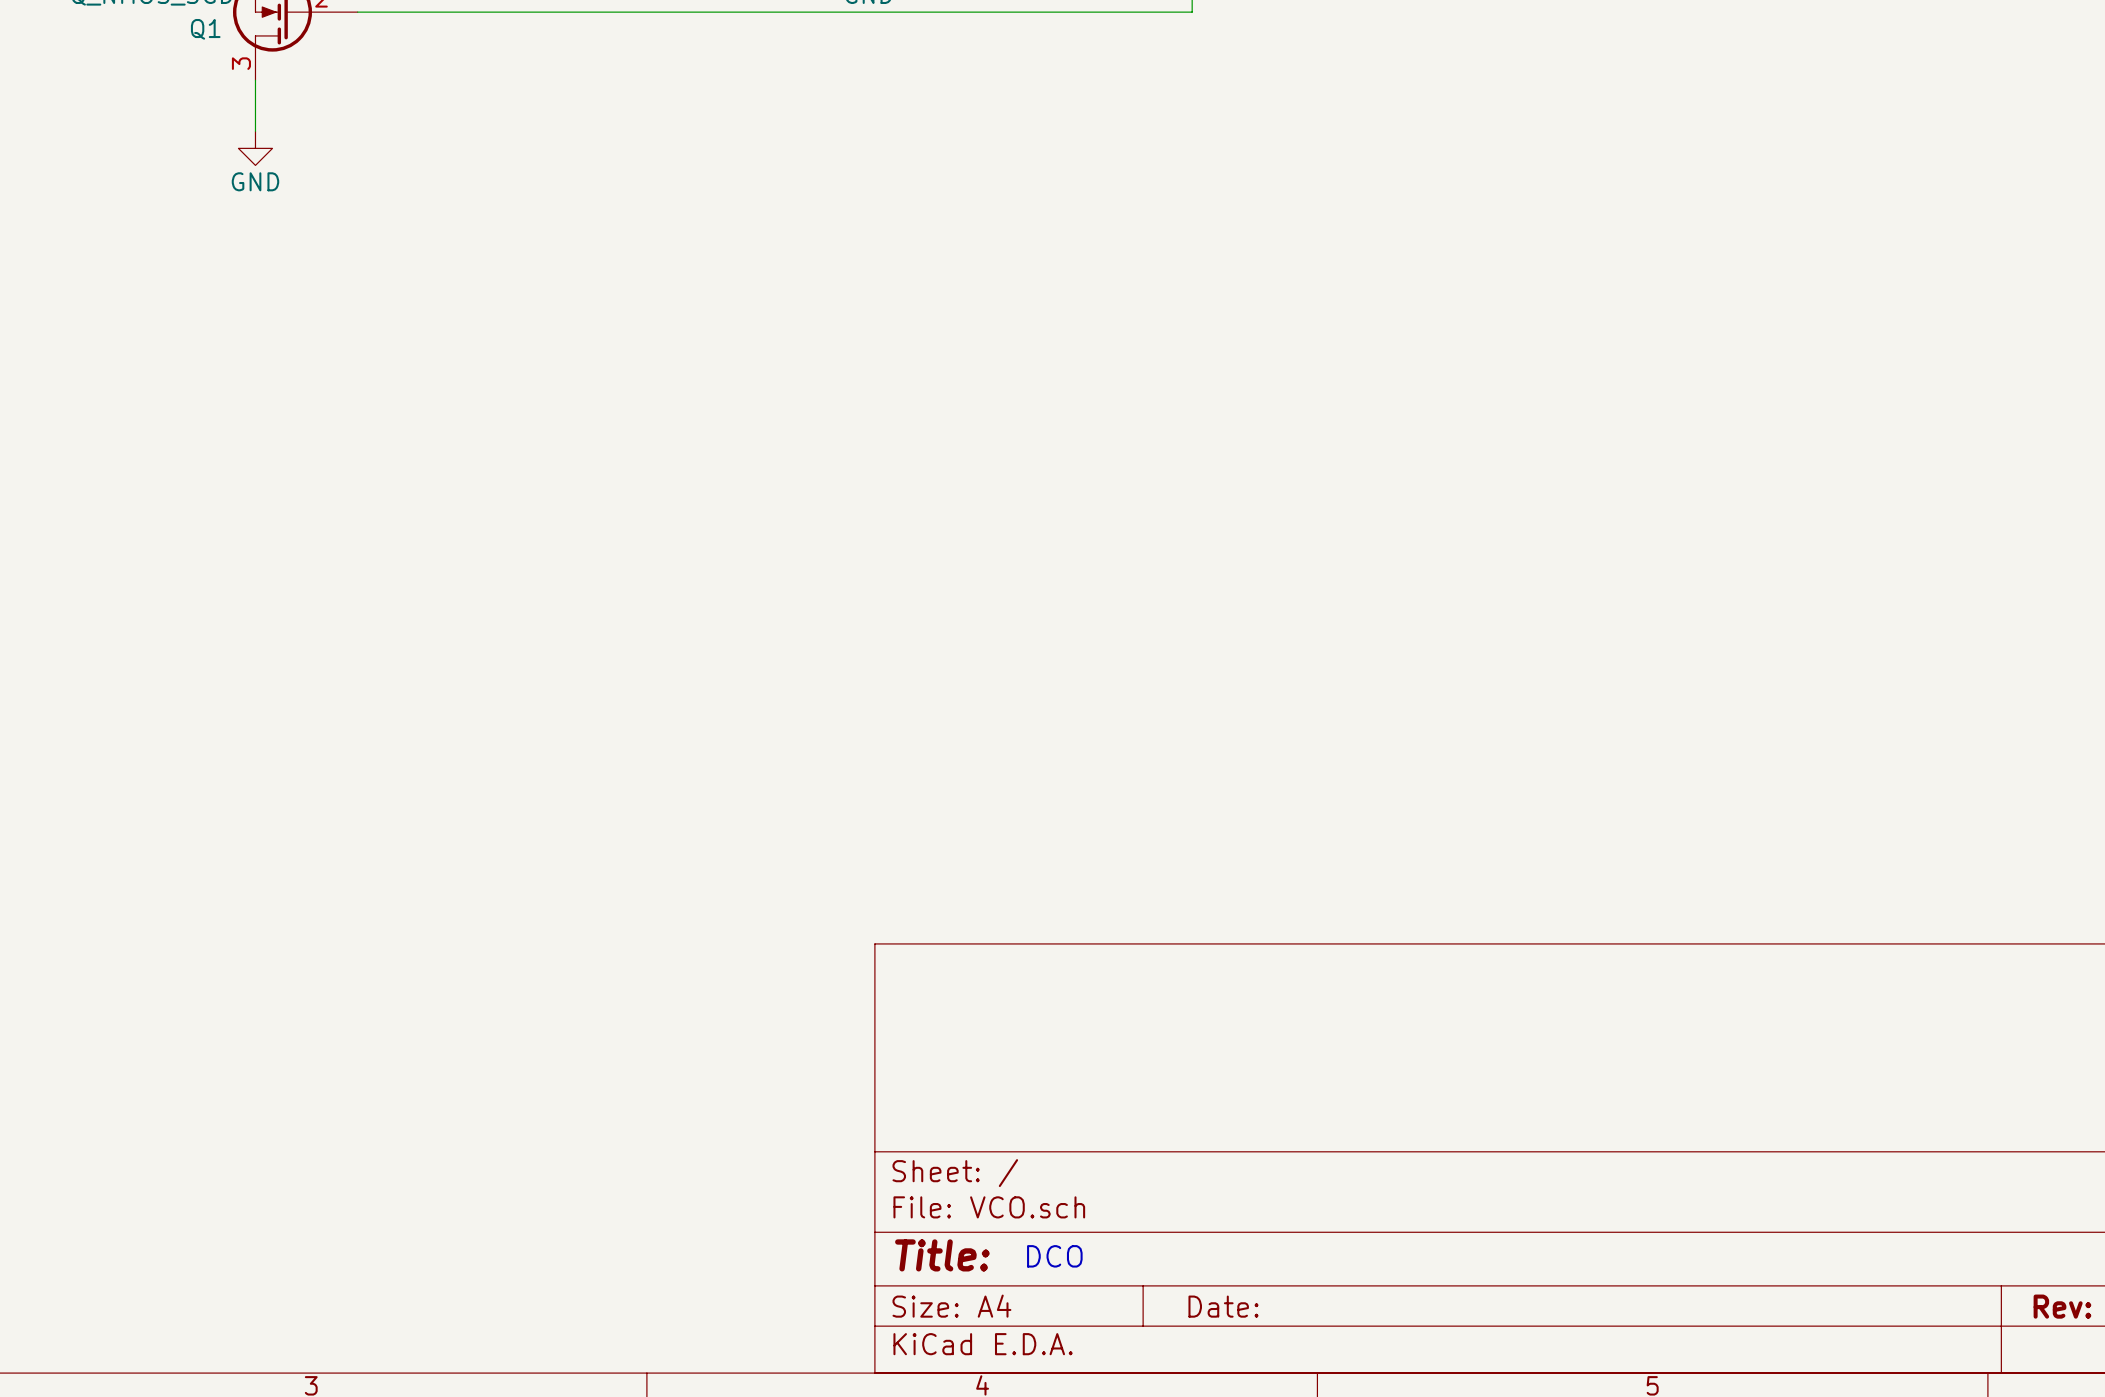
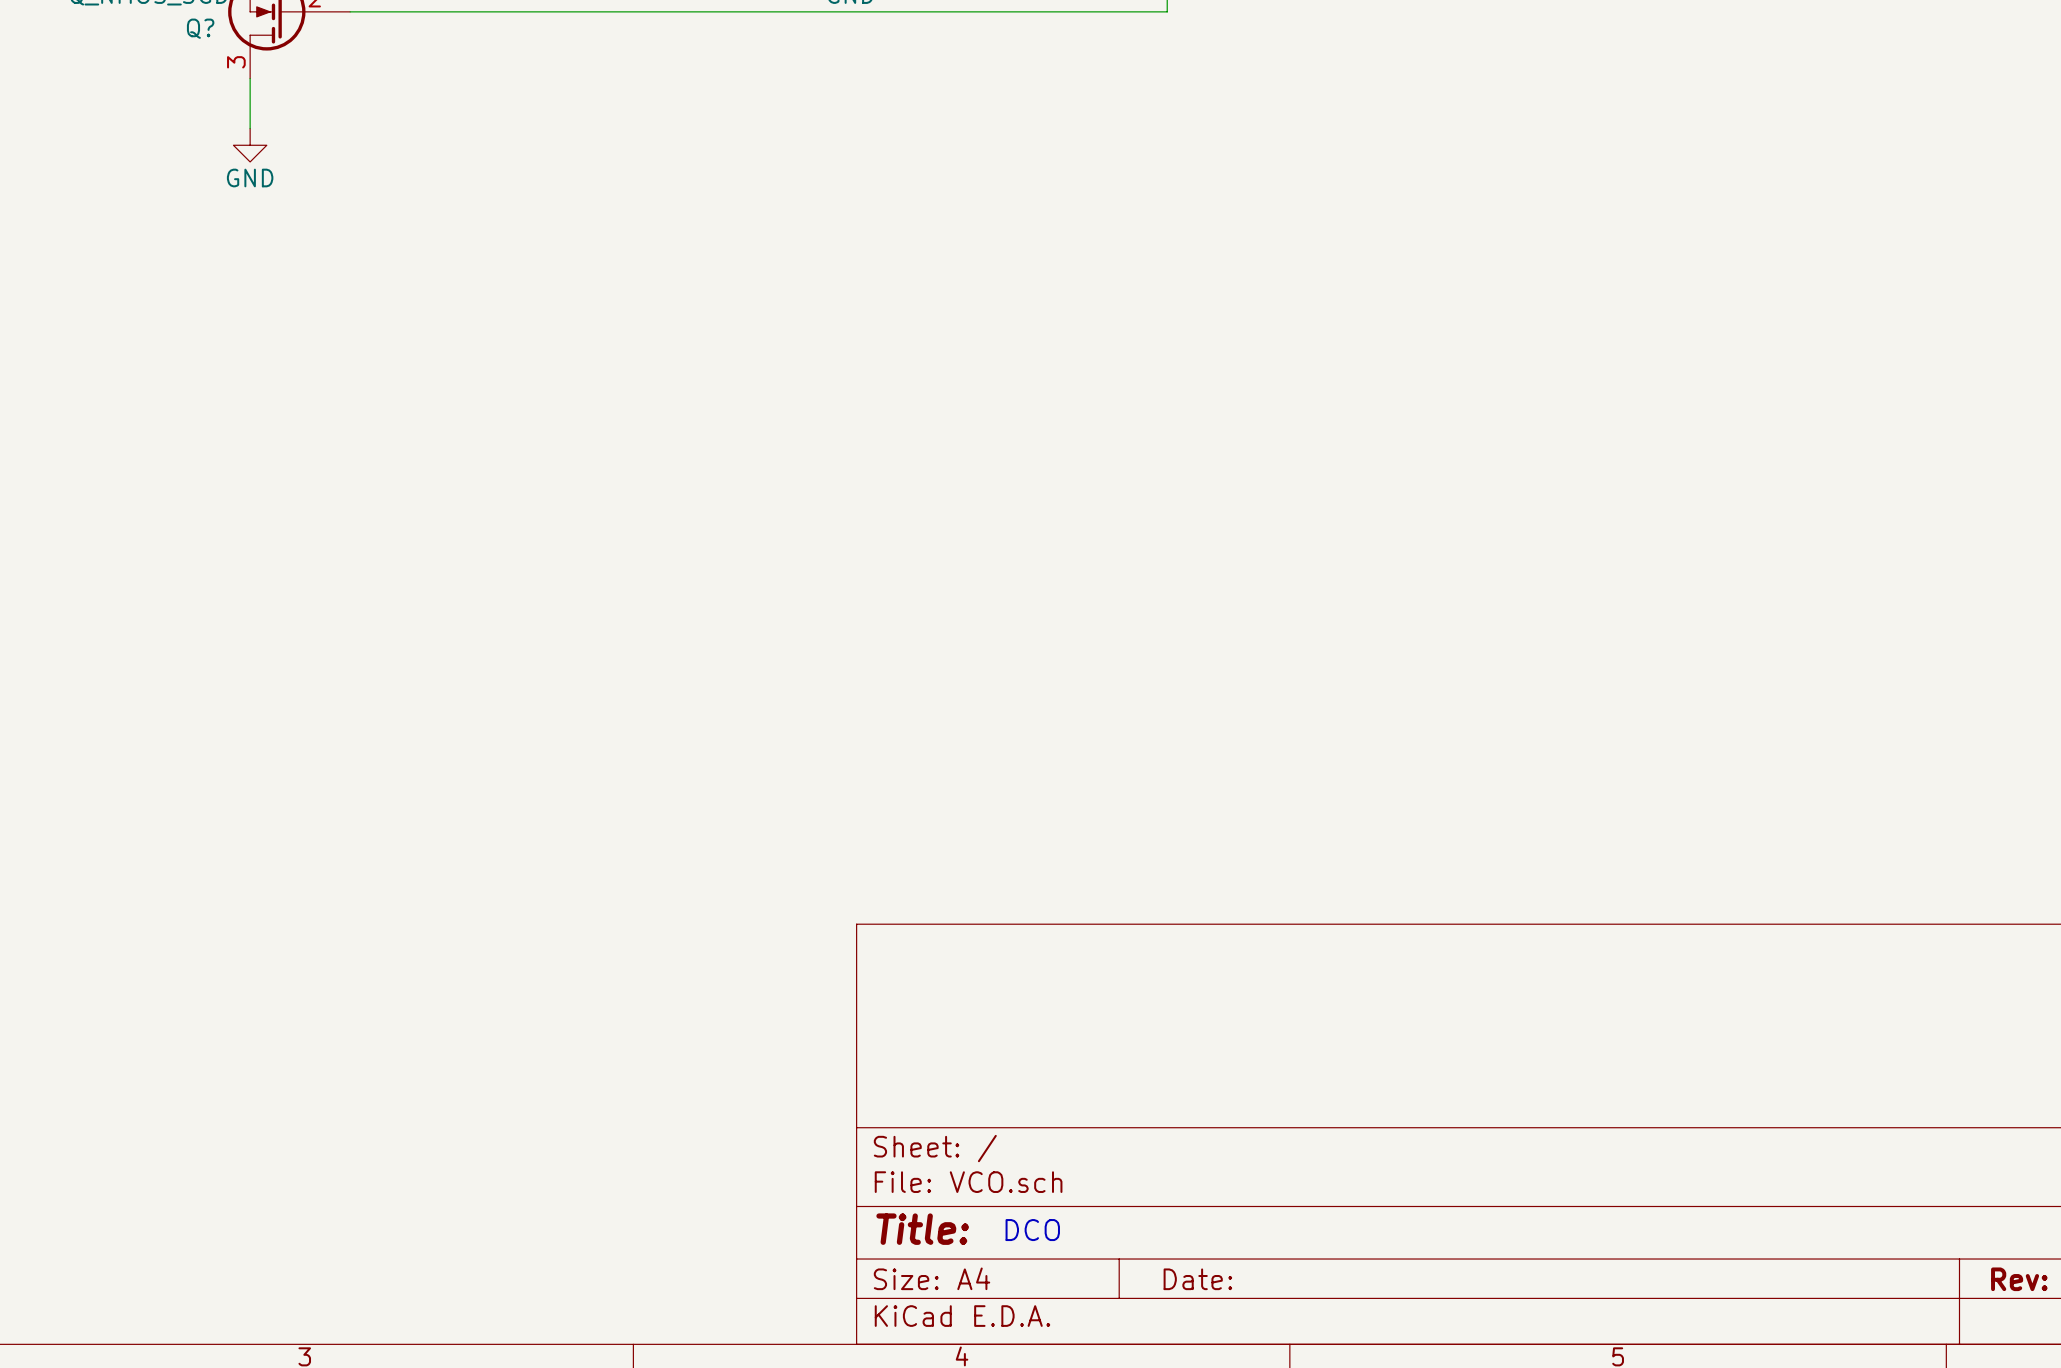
Q1 name: Q1 (205, 29) -> Q? (200, 28)

